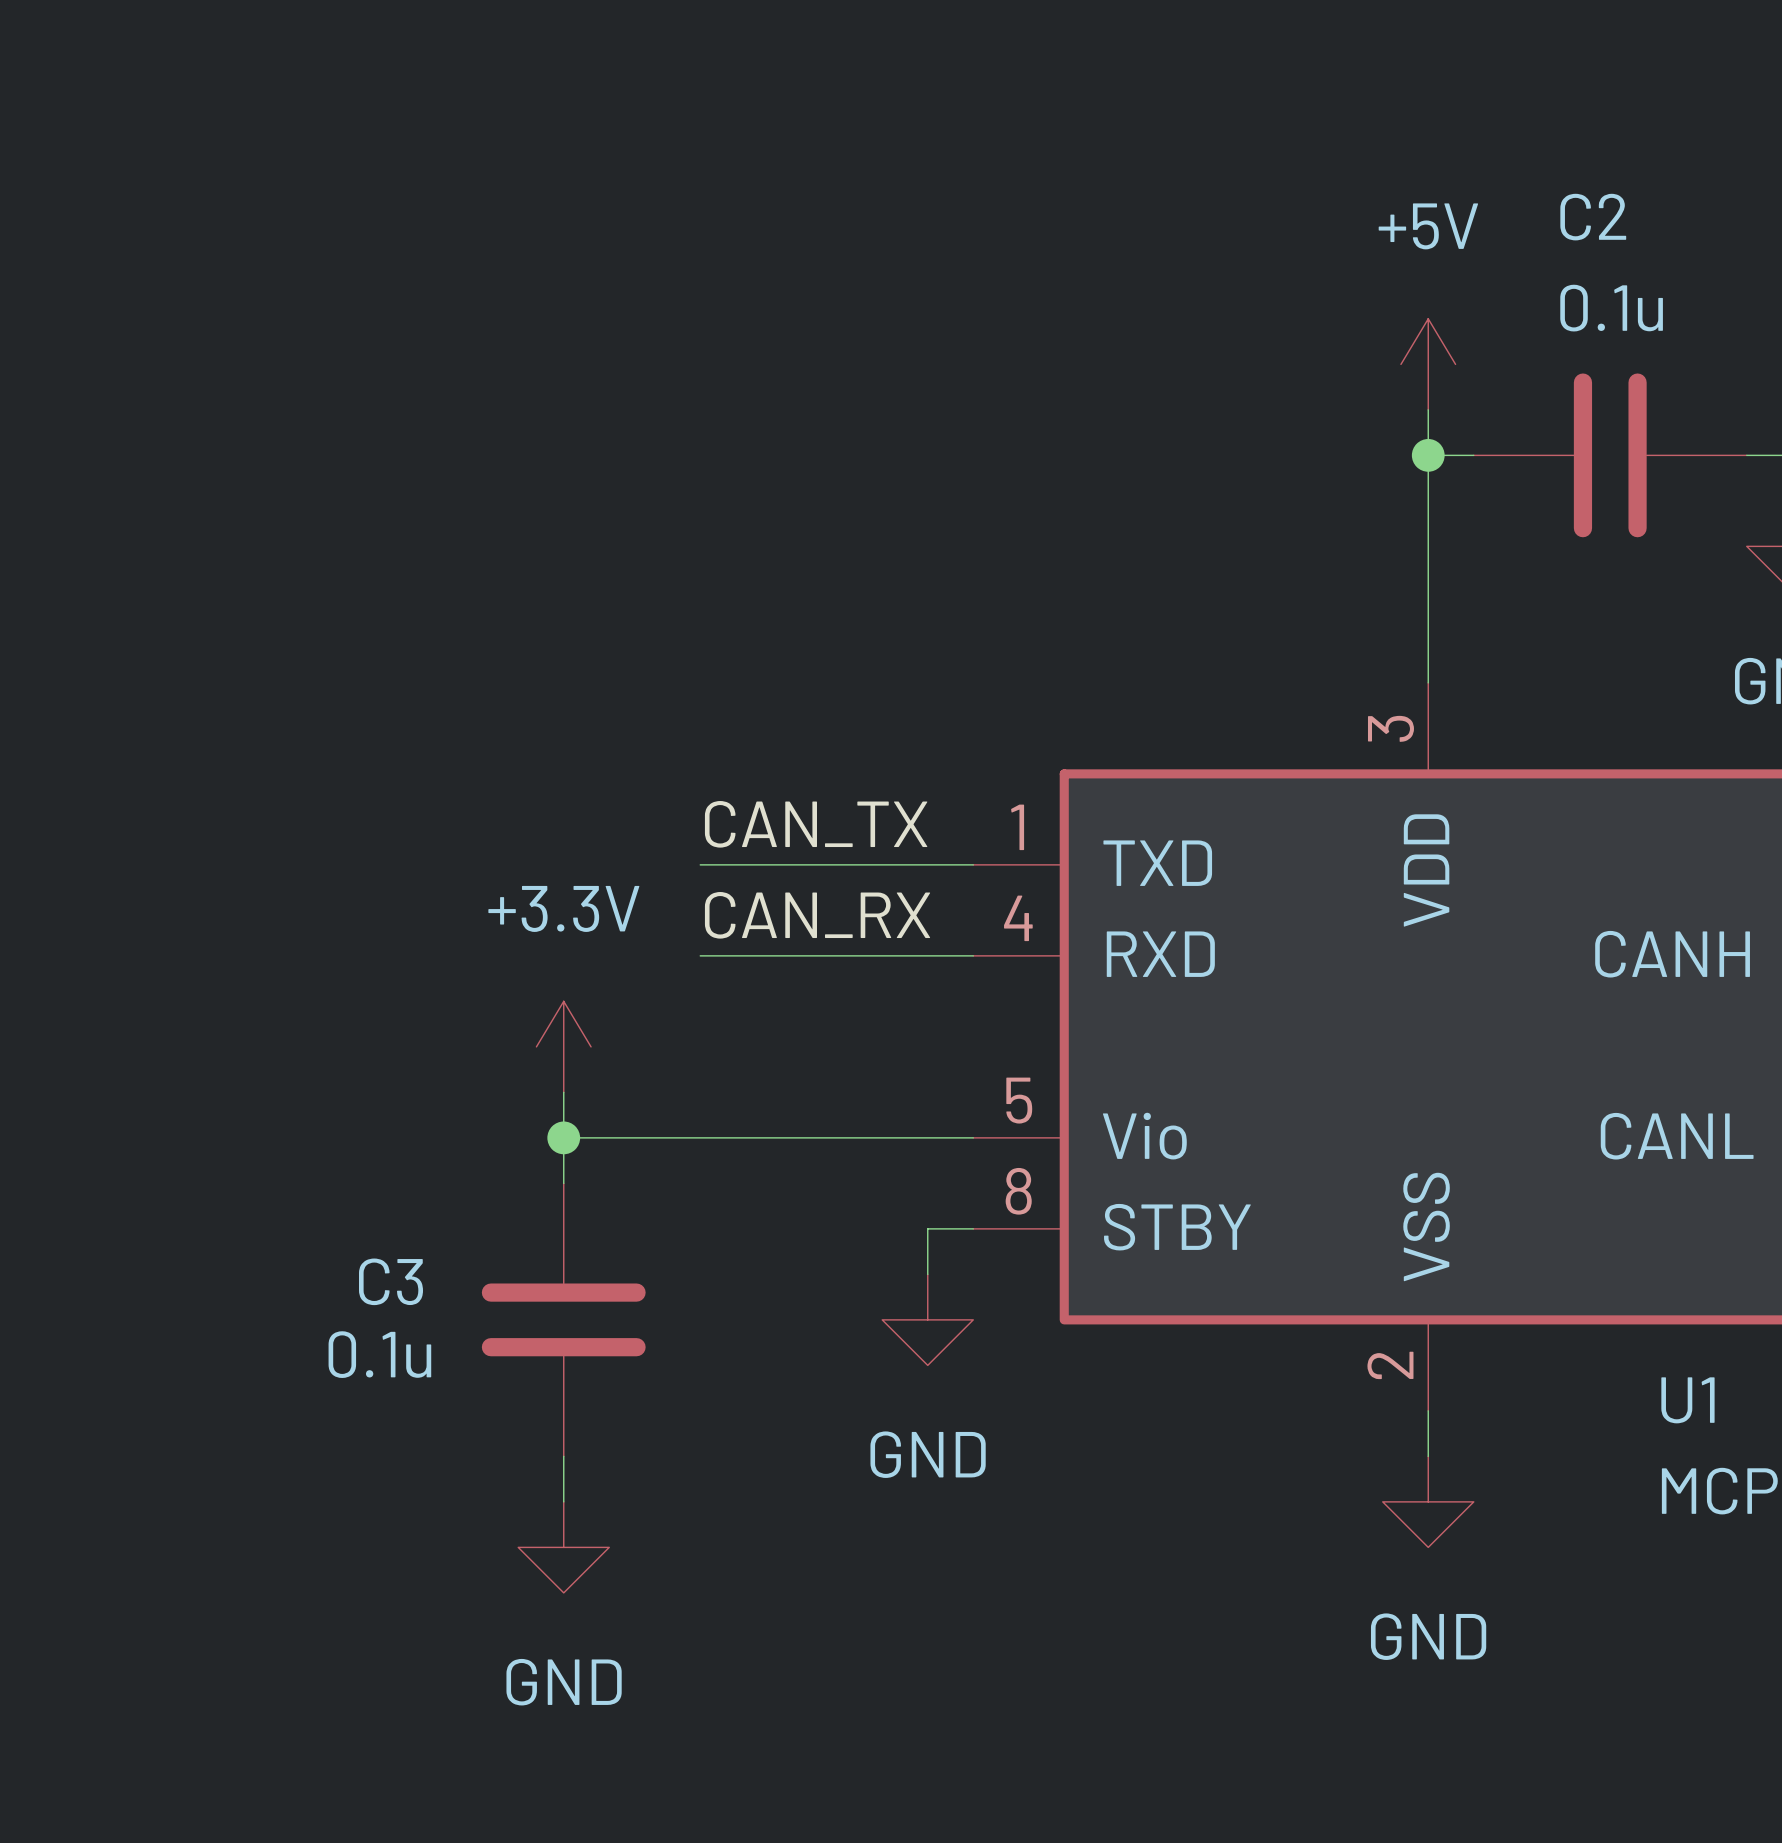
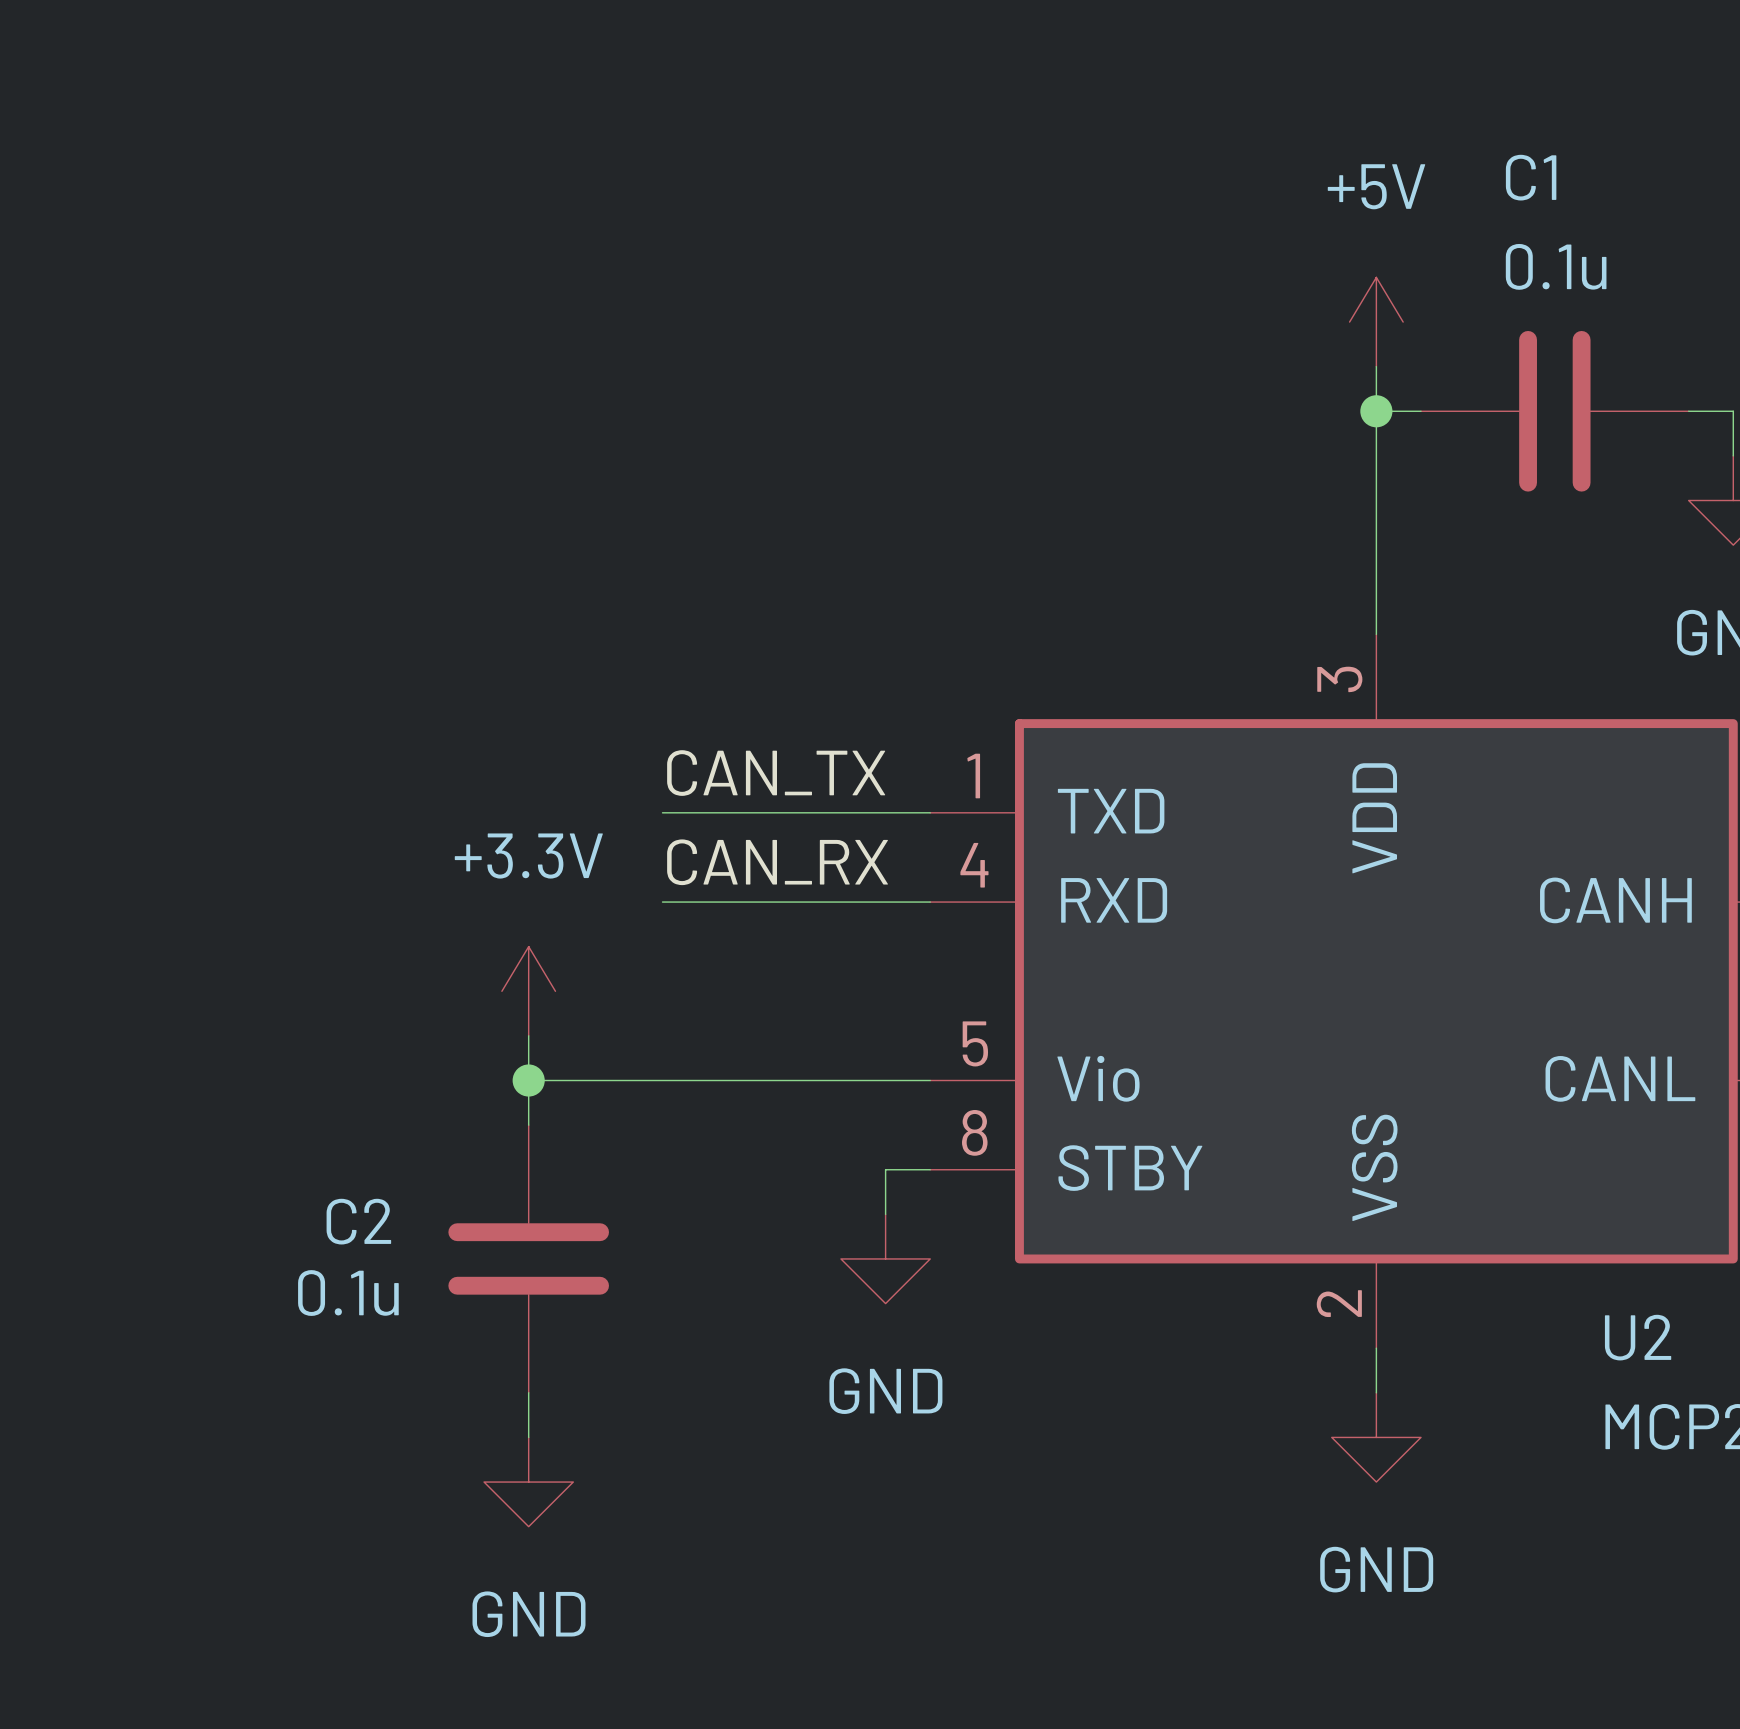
C2 name: C2 (1593, 217) -> C1 (1531, 177)
C3 name: C3 (391, 1281) -> C2 (358, 1221)
U1 name: U1 (1687, 1400) -> U2 (1638, 1337)

